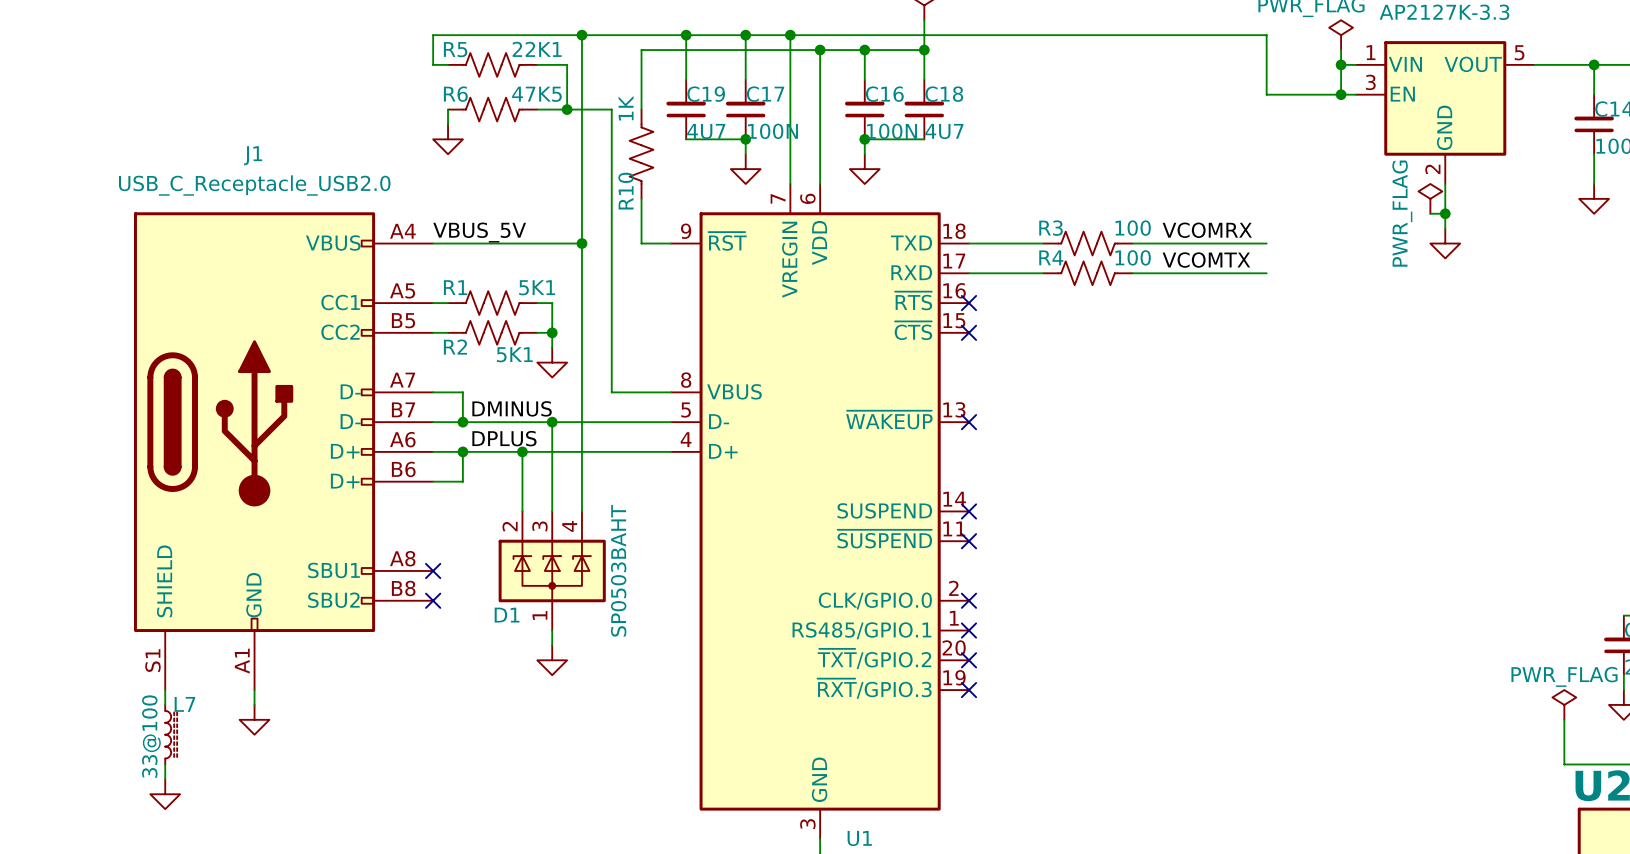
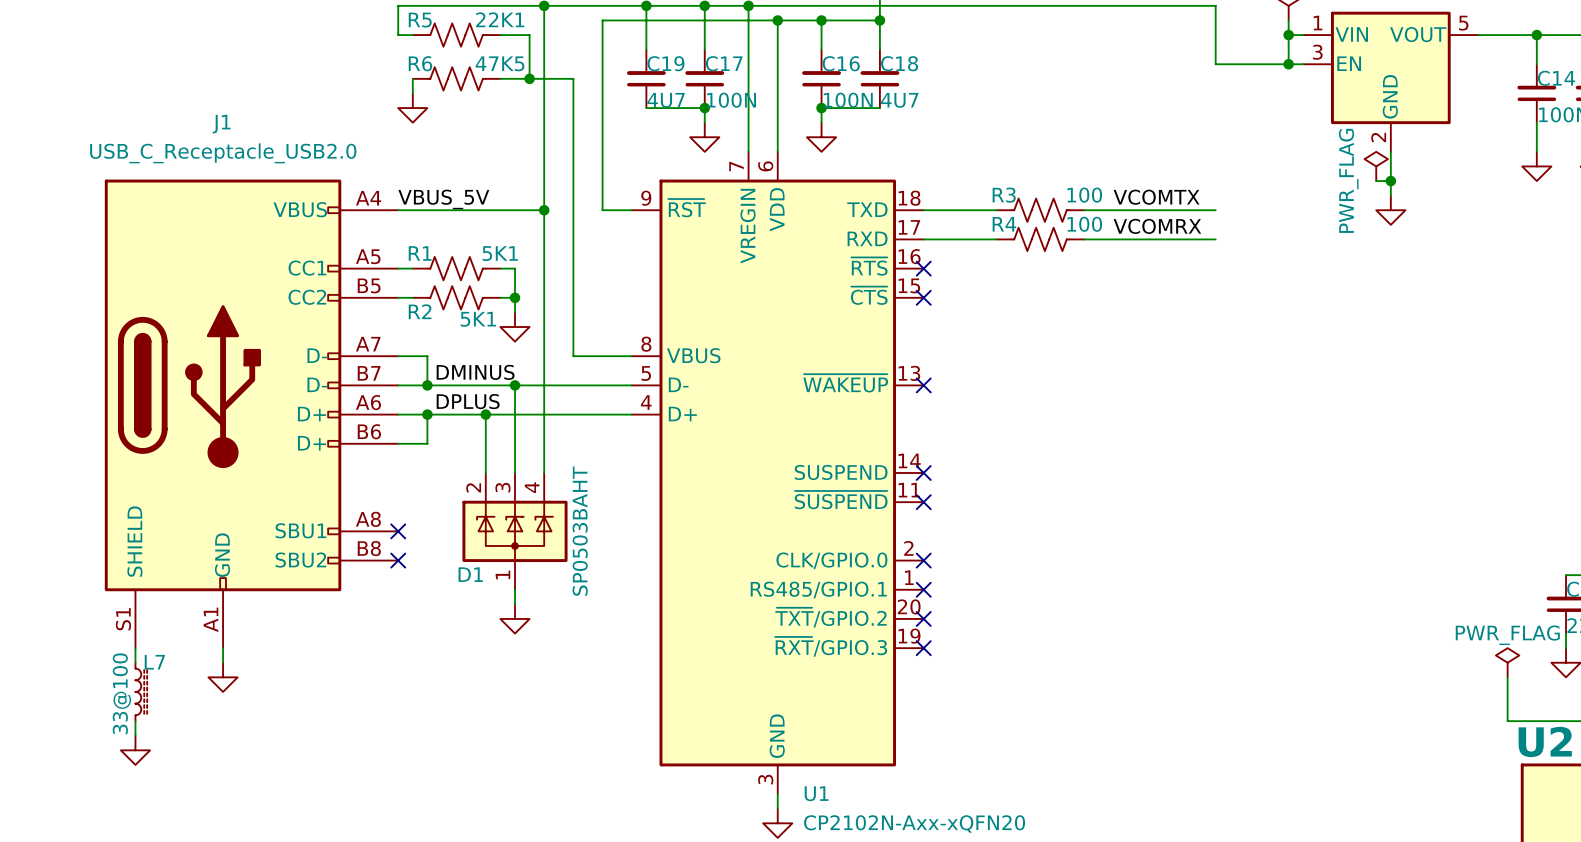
R10: 1K (641, 154) -> none
label: VCOMRX (1207, 230) -> VCOMTX (1156, 197)
label: VCOMTX (1206, 260) -> VCOMRX (1157, 226)

